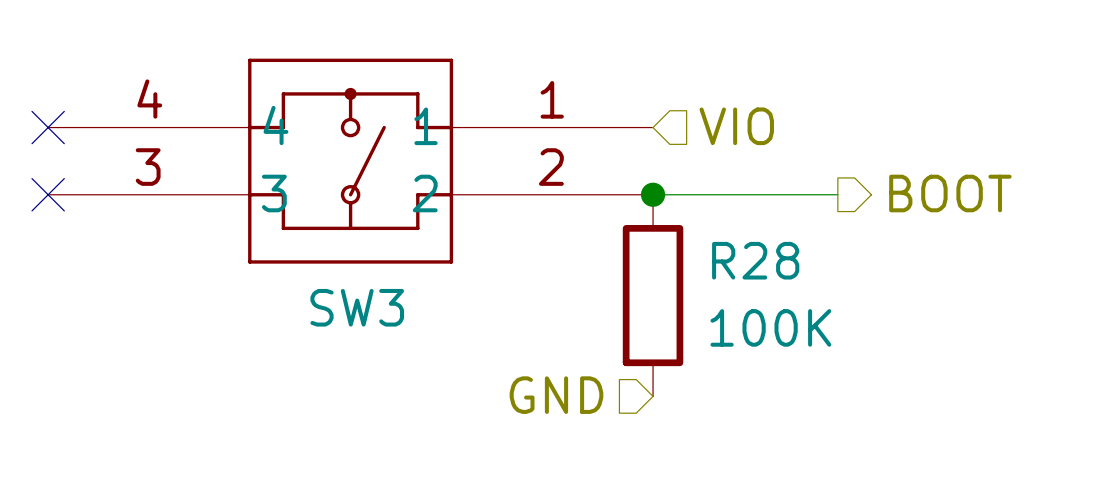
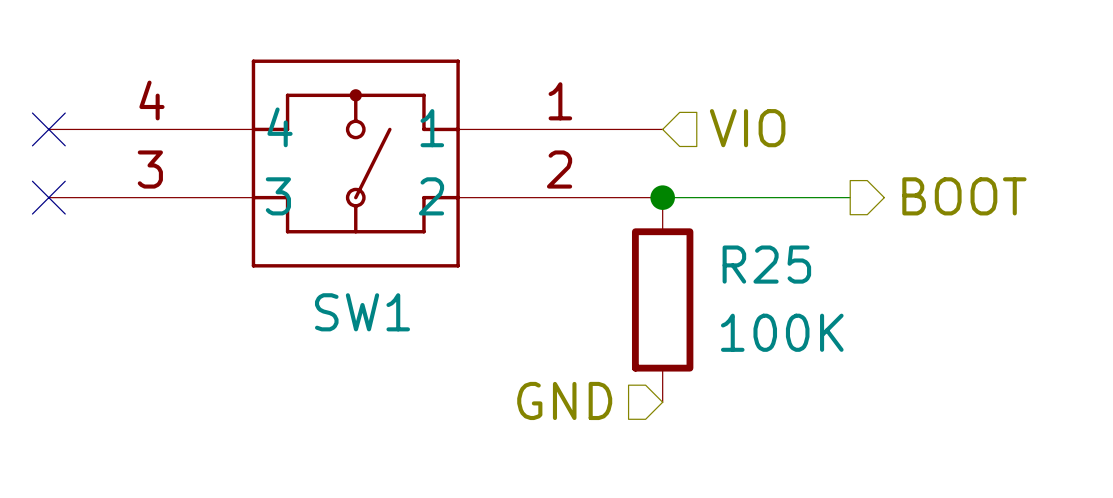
R28 name: R28 (755, 260) -> R25 (766, 264)
SW3 name: SW3 (357, 307) -> SW1 (362, 312)

